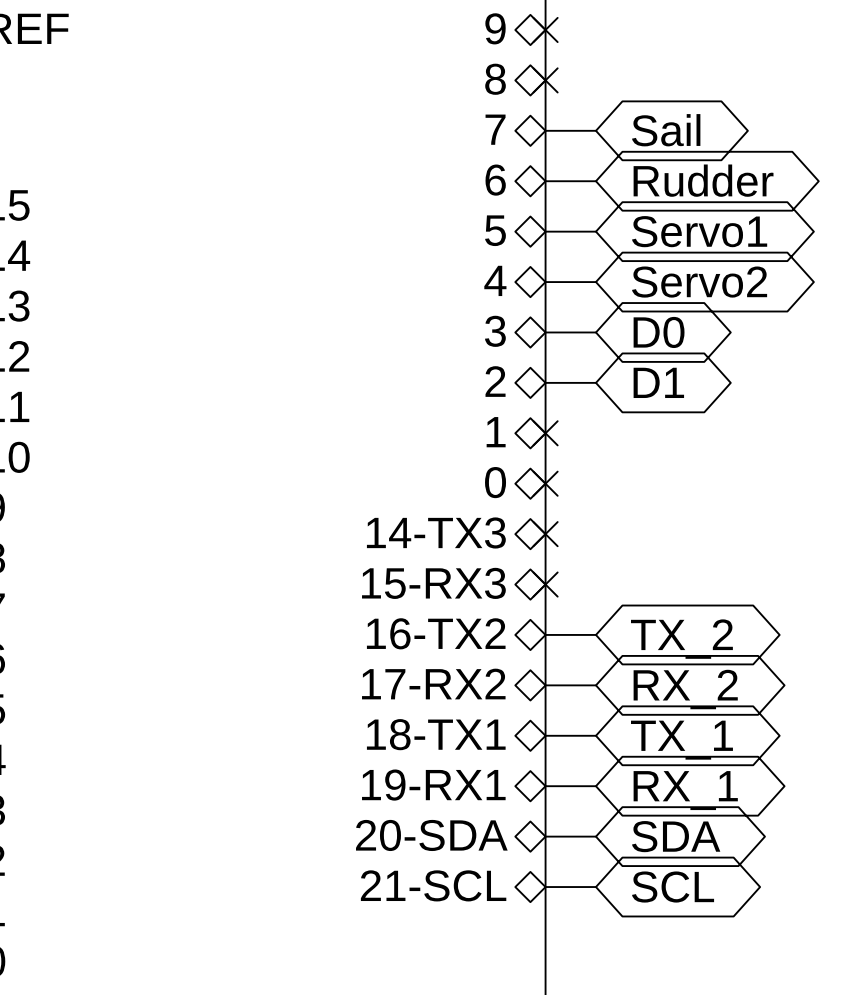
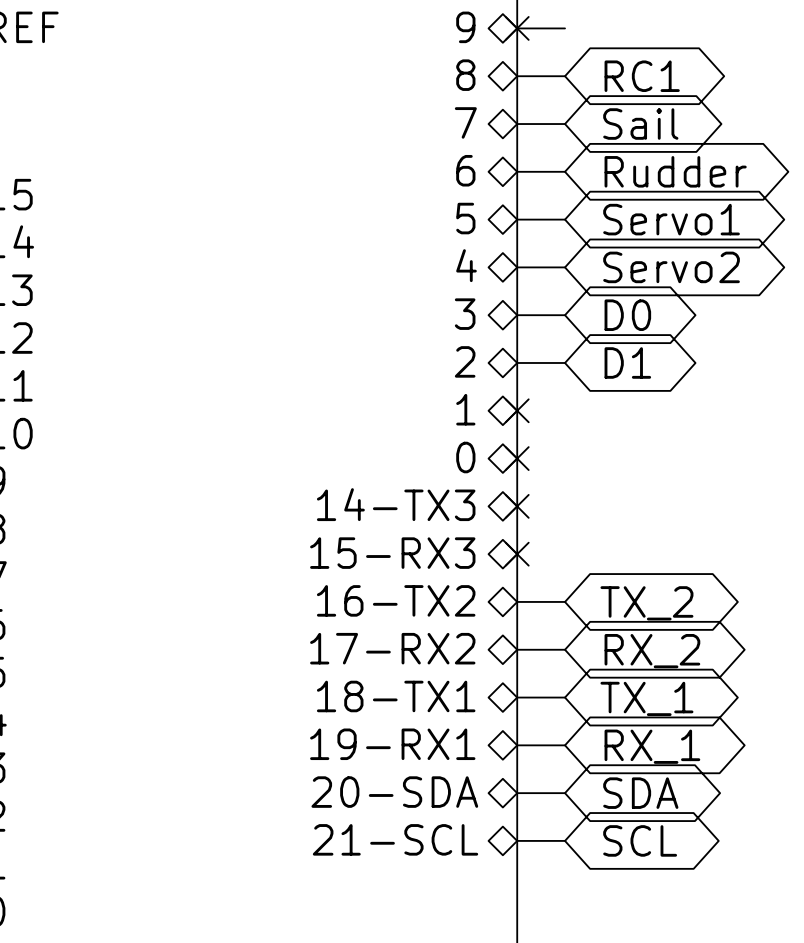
wire: none -> (517, 28) (565, 28)
wire: none -> (517, 76) (565, 76)
no-connect mark: (545, 80) -> none
global label: none -> RC1 (642, 76)

